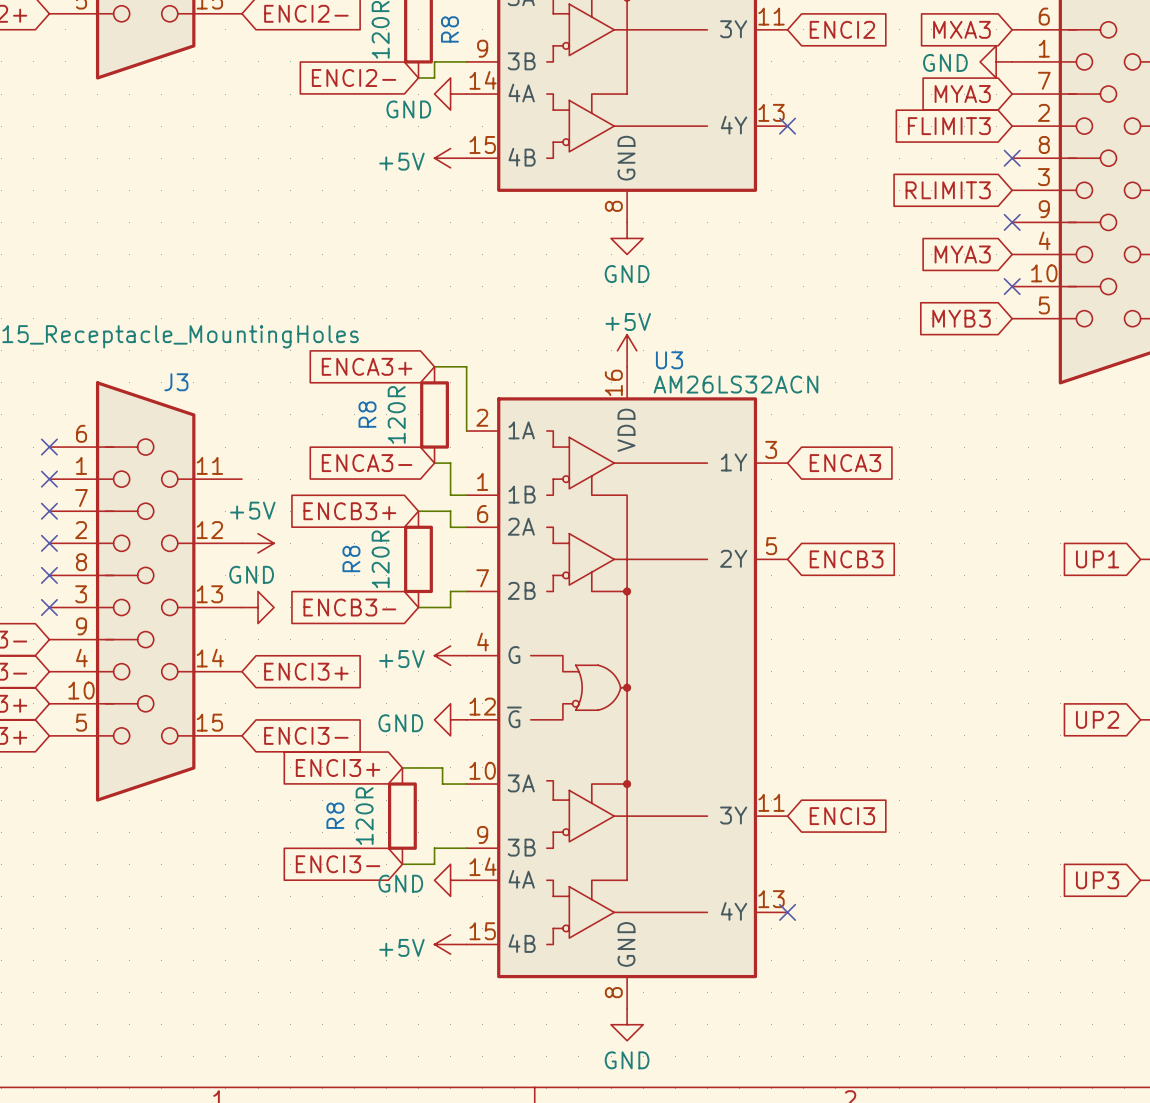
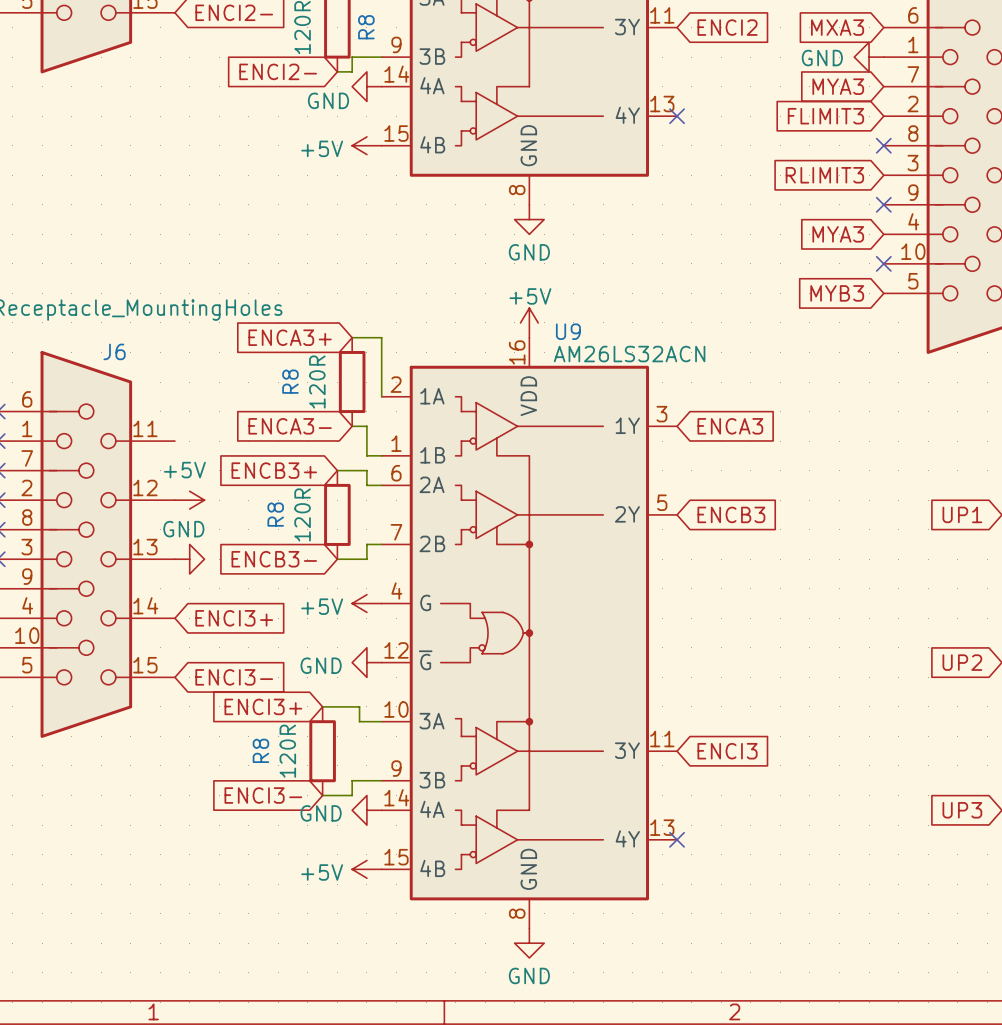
U3 name: U3 (669, 360) -> U9 (568, 331)
J3 name: J3 (176, 382) -> J6 (114, 351)

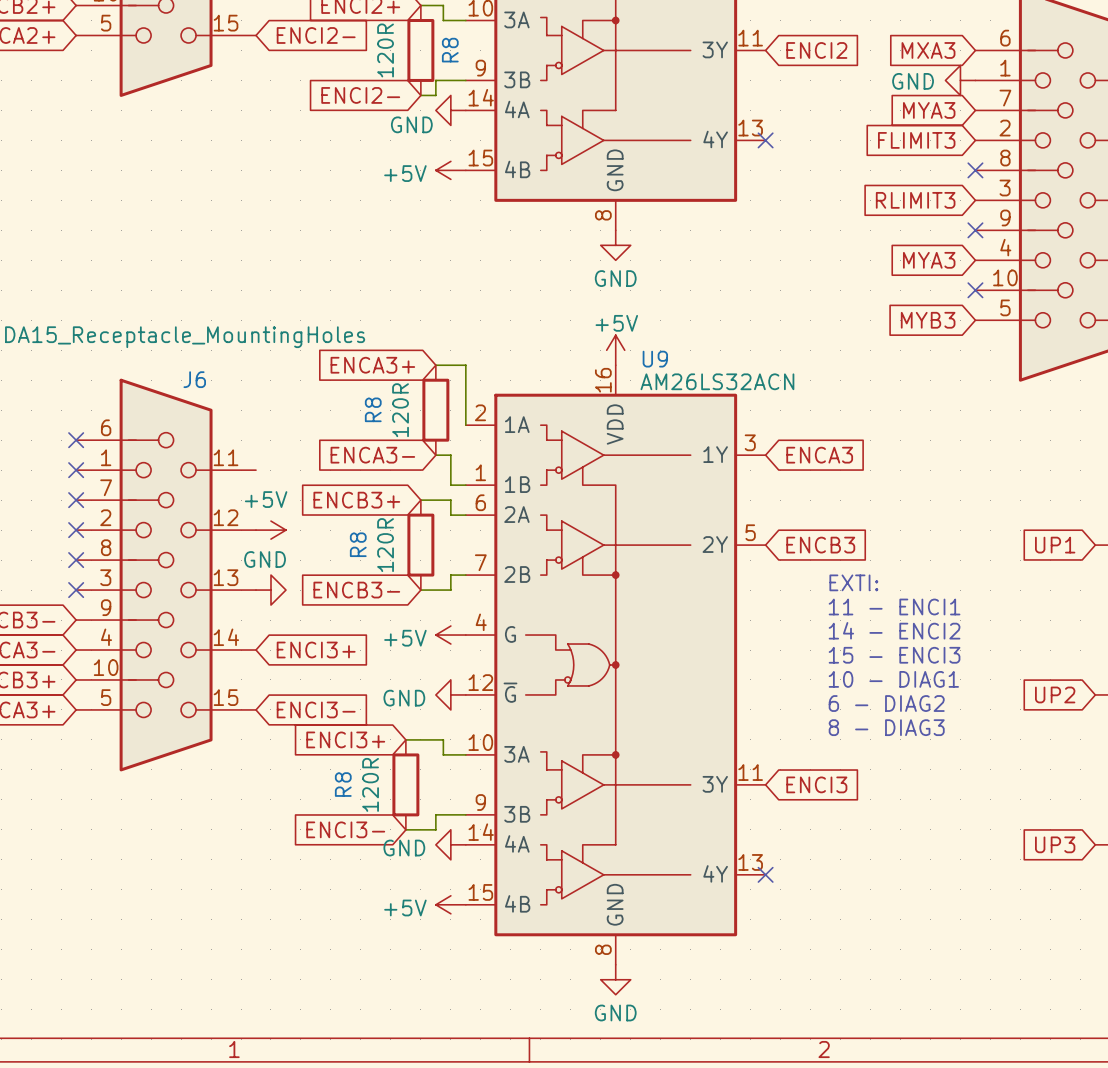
text: none -> EXTI: (853, 582)
text: none -> 11 - ENCI1 (894, 607)
text: none -> 14 - ENCI2 (894, 630)
text: none -> 15 - ENCI3 (894, 655)
text: none -> 10 - DIAG1 (893, 679)
text: none -> 6 - DIAG2 (886, 703)
text: none -> 8 - DIAG3 (886, 727)

